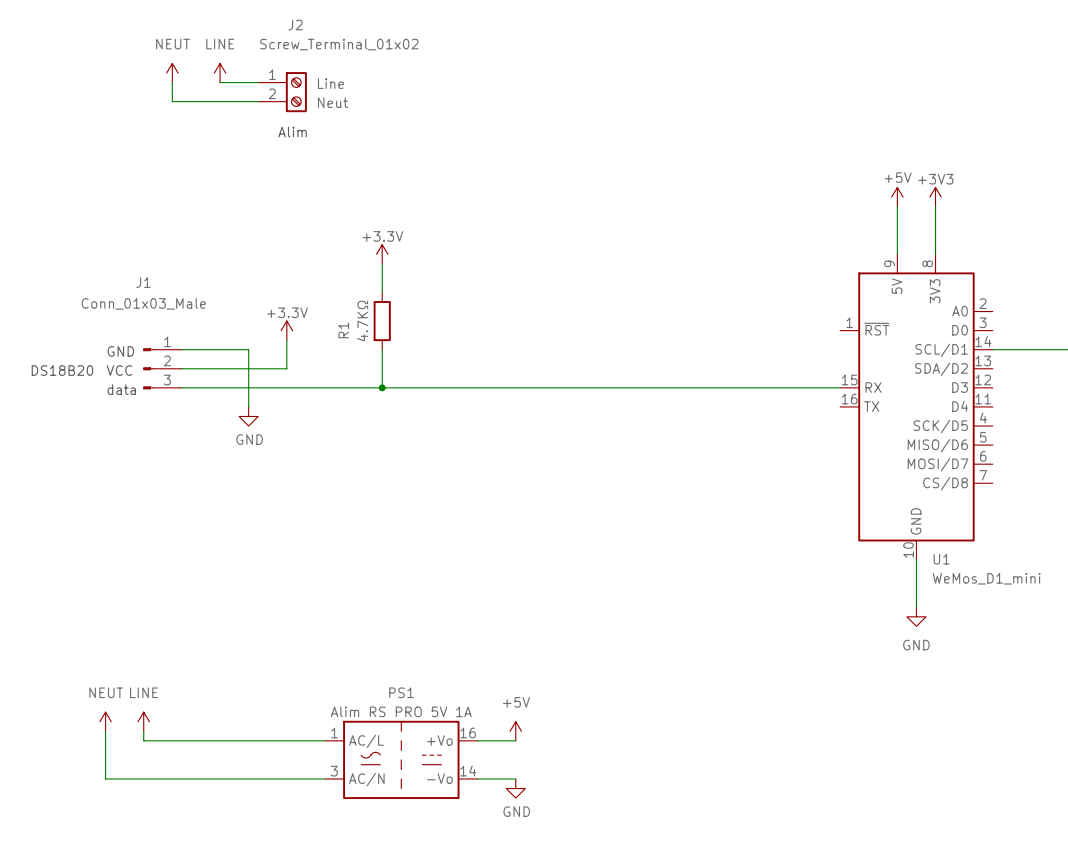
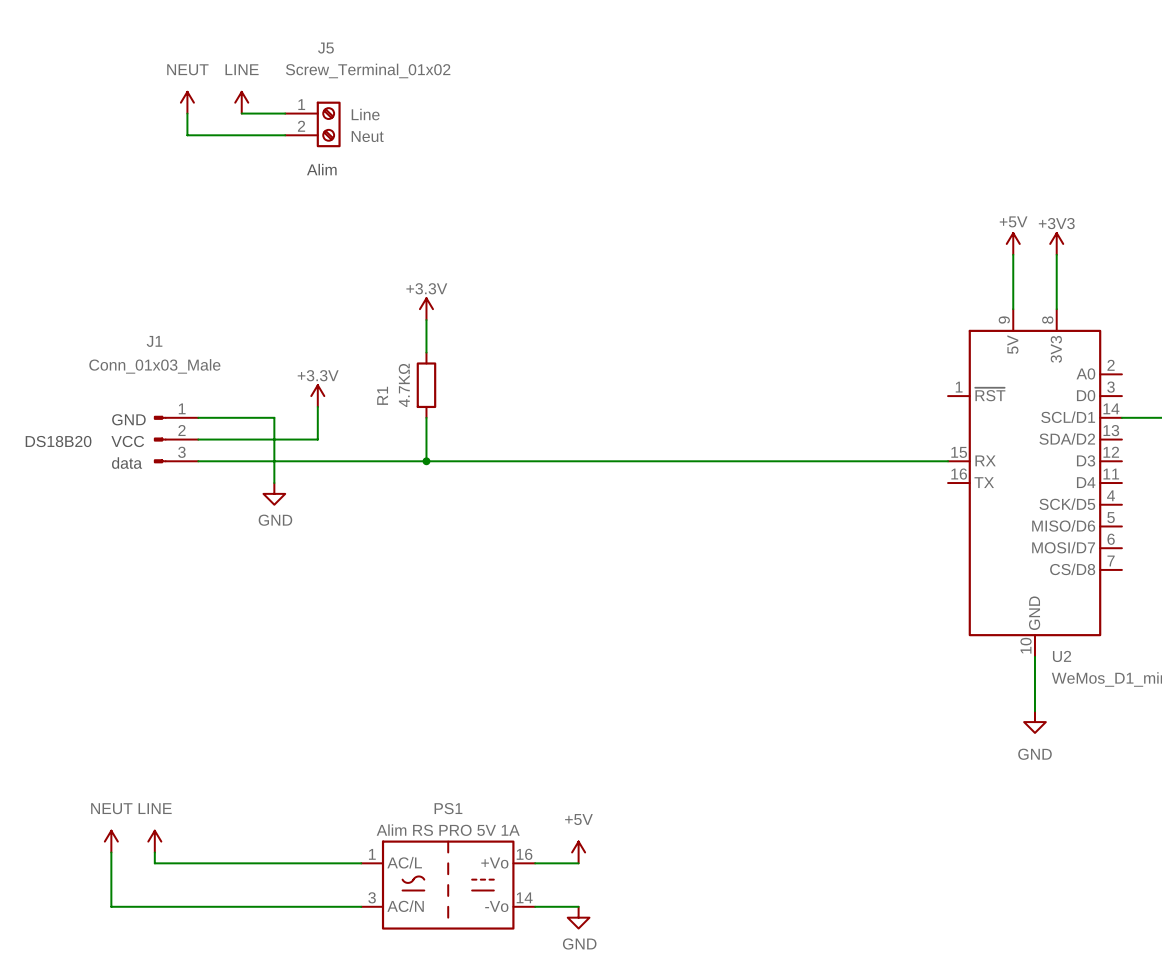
J2 name: J2 (295, 25) -> J5 (325, 48)
U1 name: U1 (941, 559) -> U2 (1062, 656)

